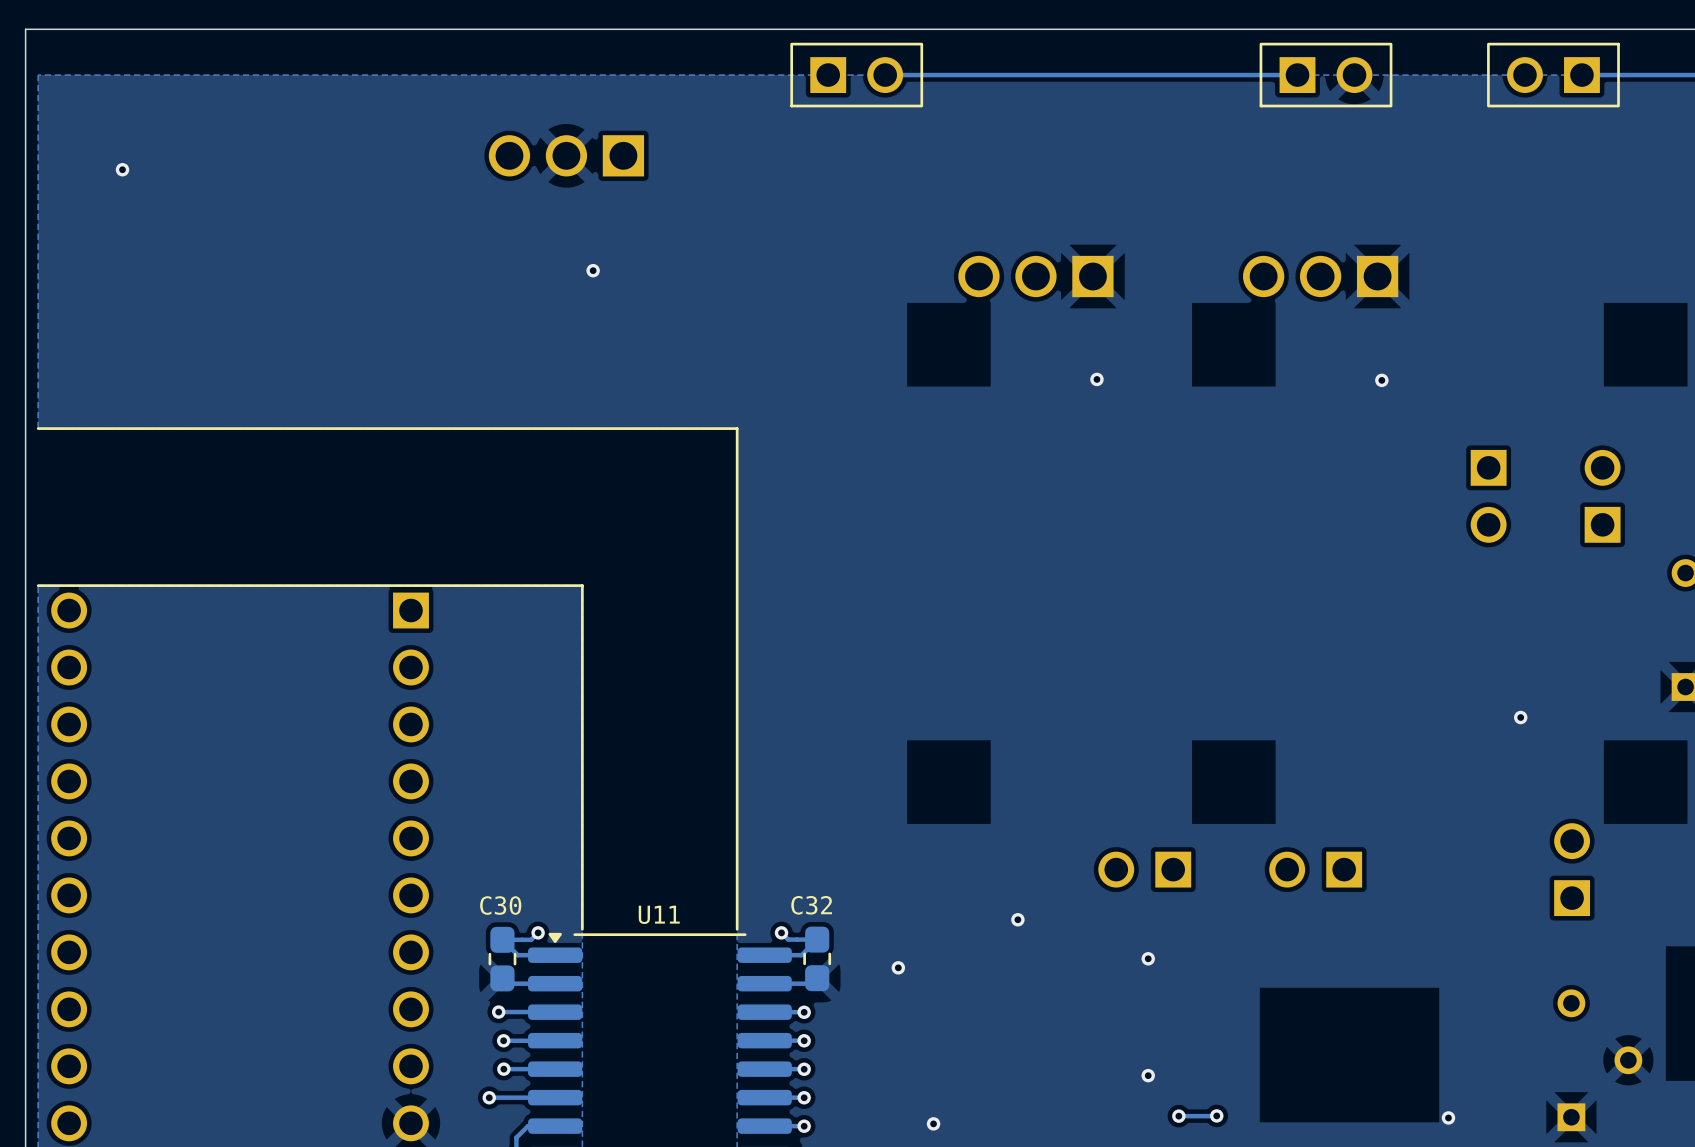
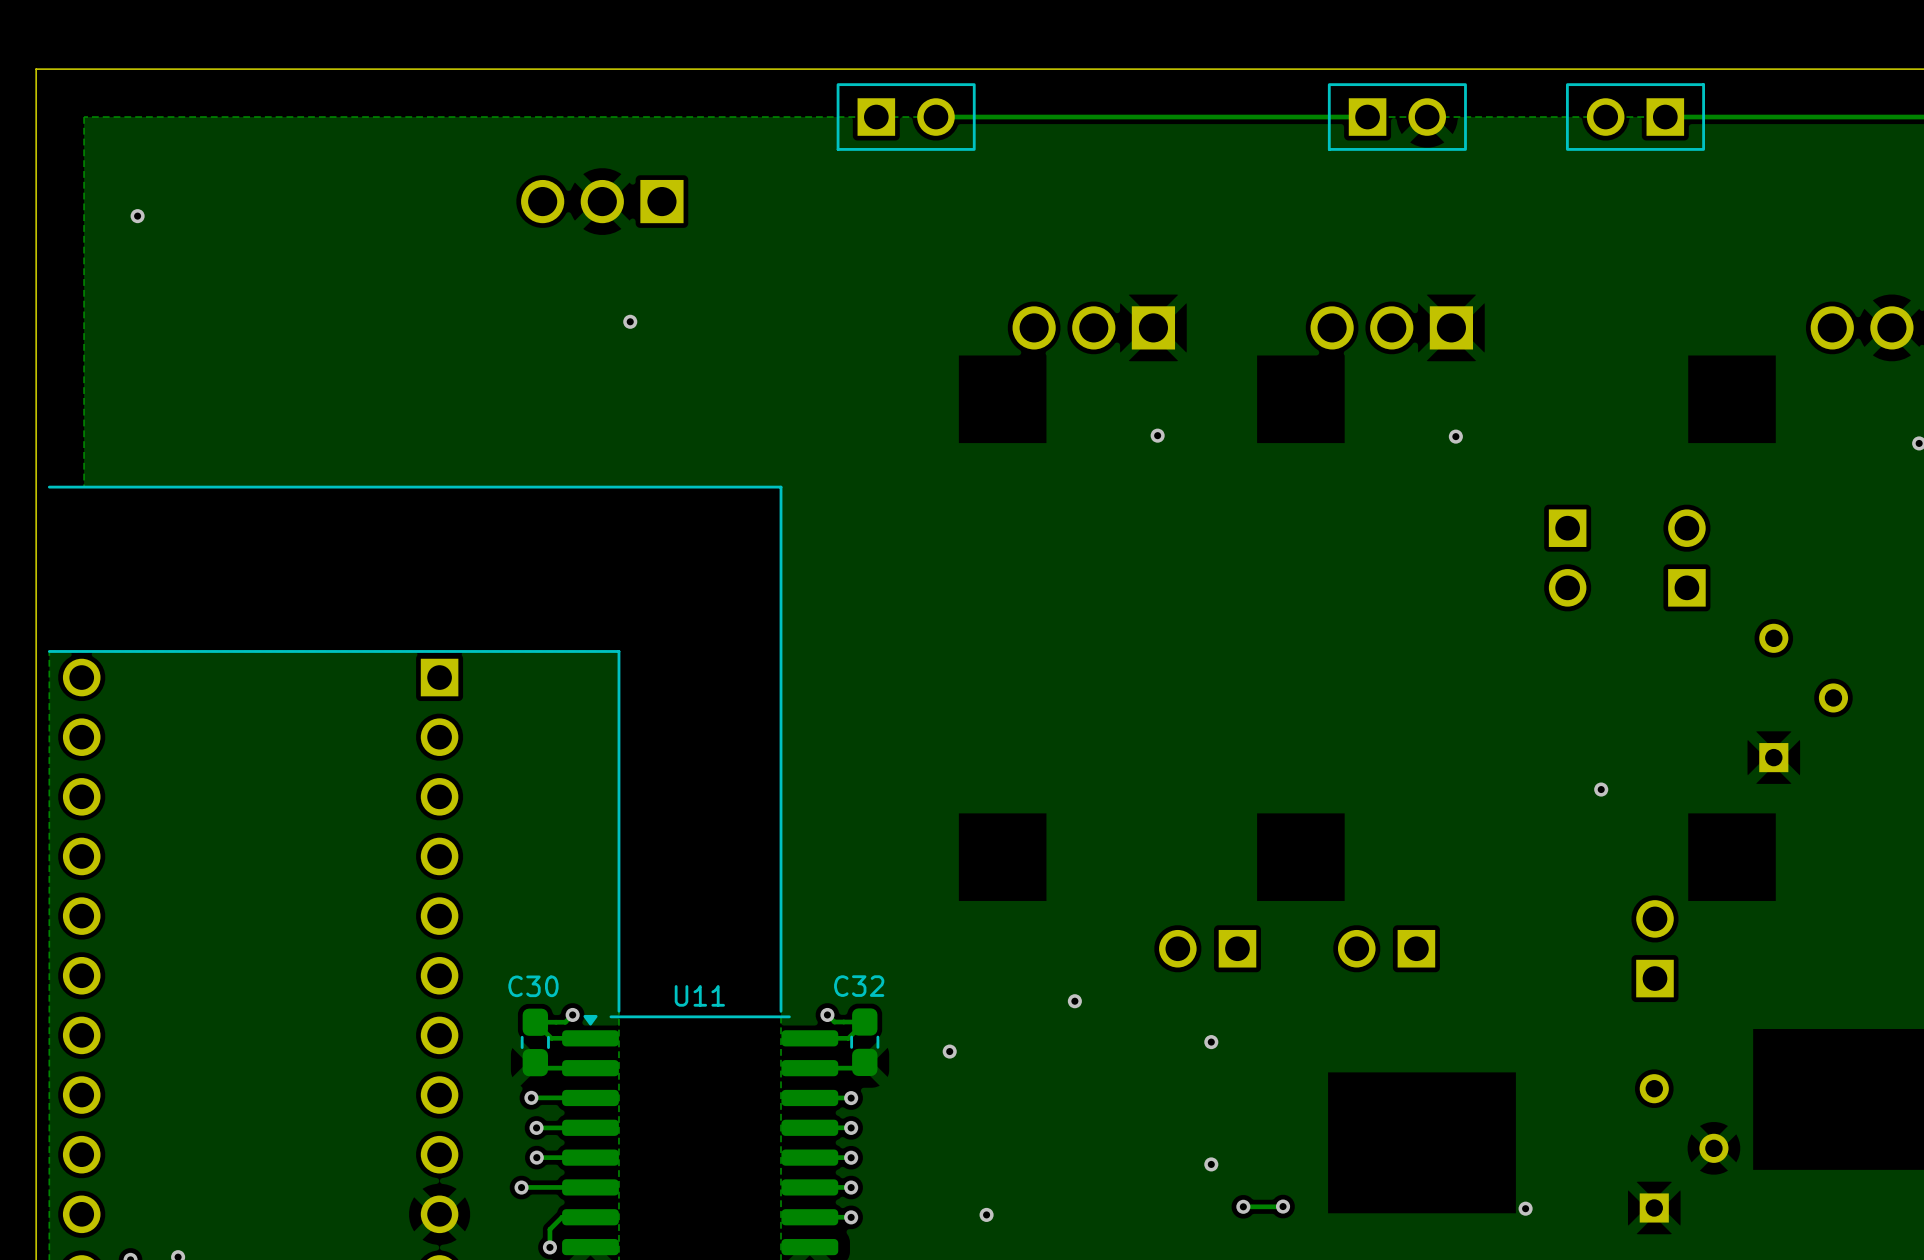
zone outline: (71, 75) (38, 75) (38, 428) (71, 428) -> (84, 117) (84, 487)

